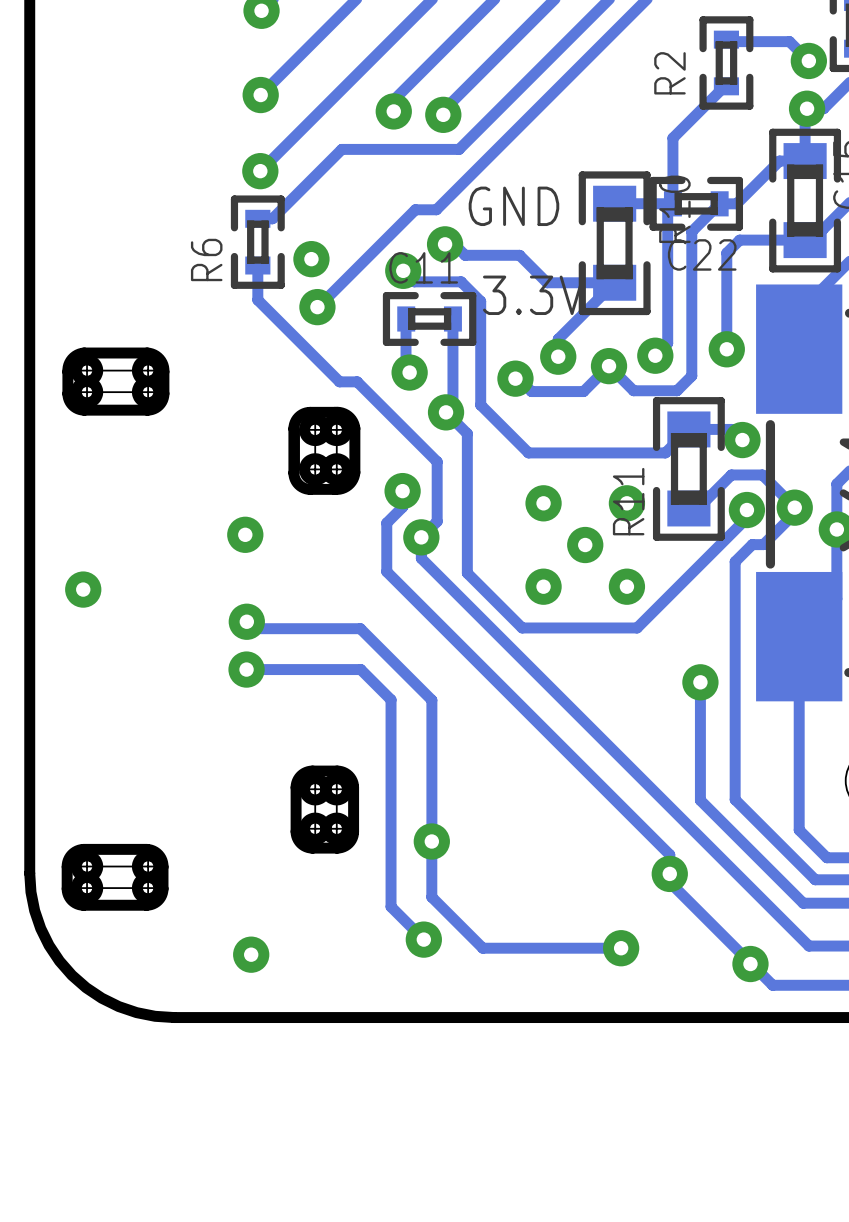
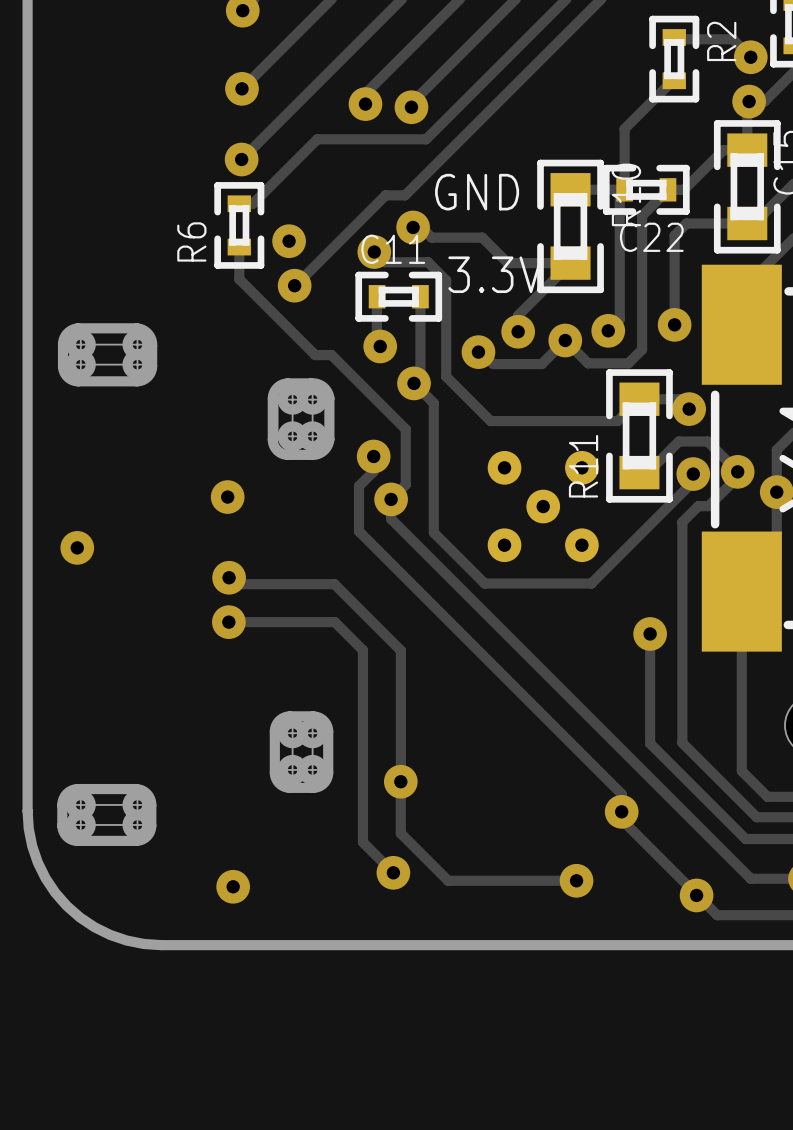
R2 name position: R2 (669, 73) -> R2 (721, 41)

